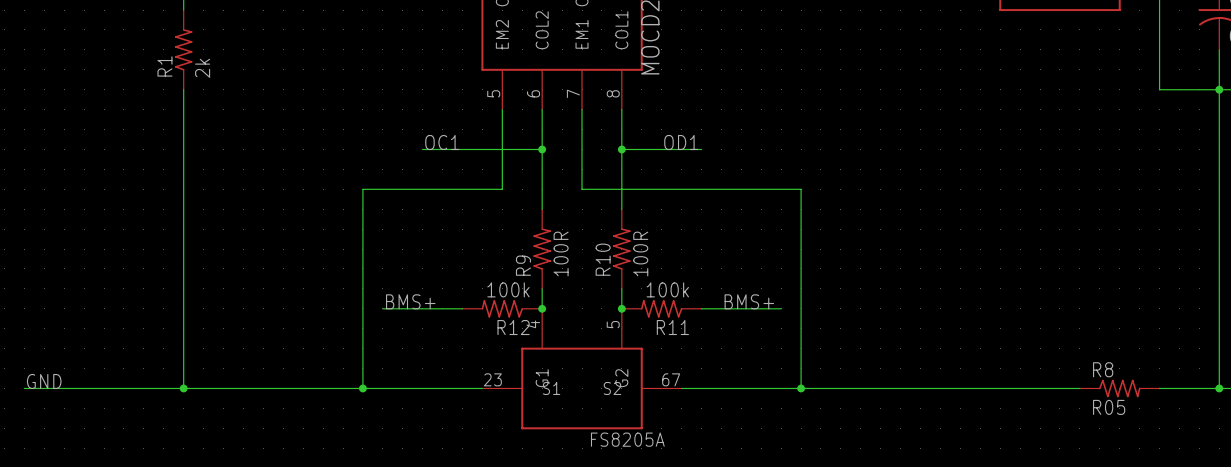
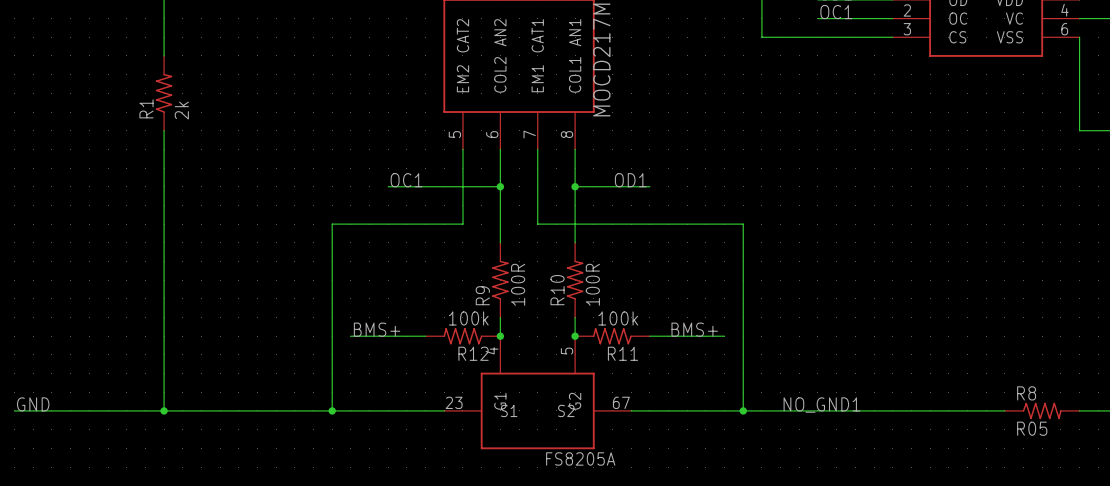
label: none -> NO_GND1 (821, 405)

